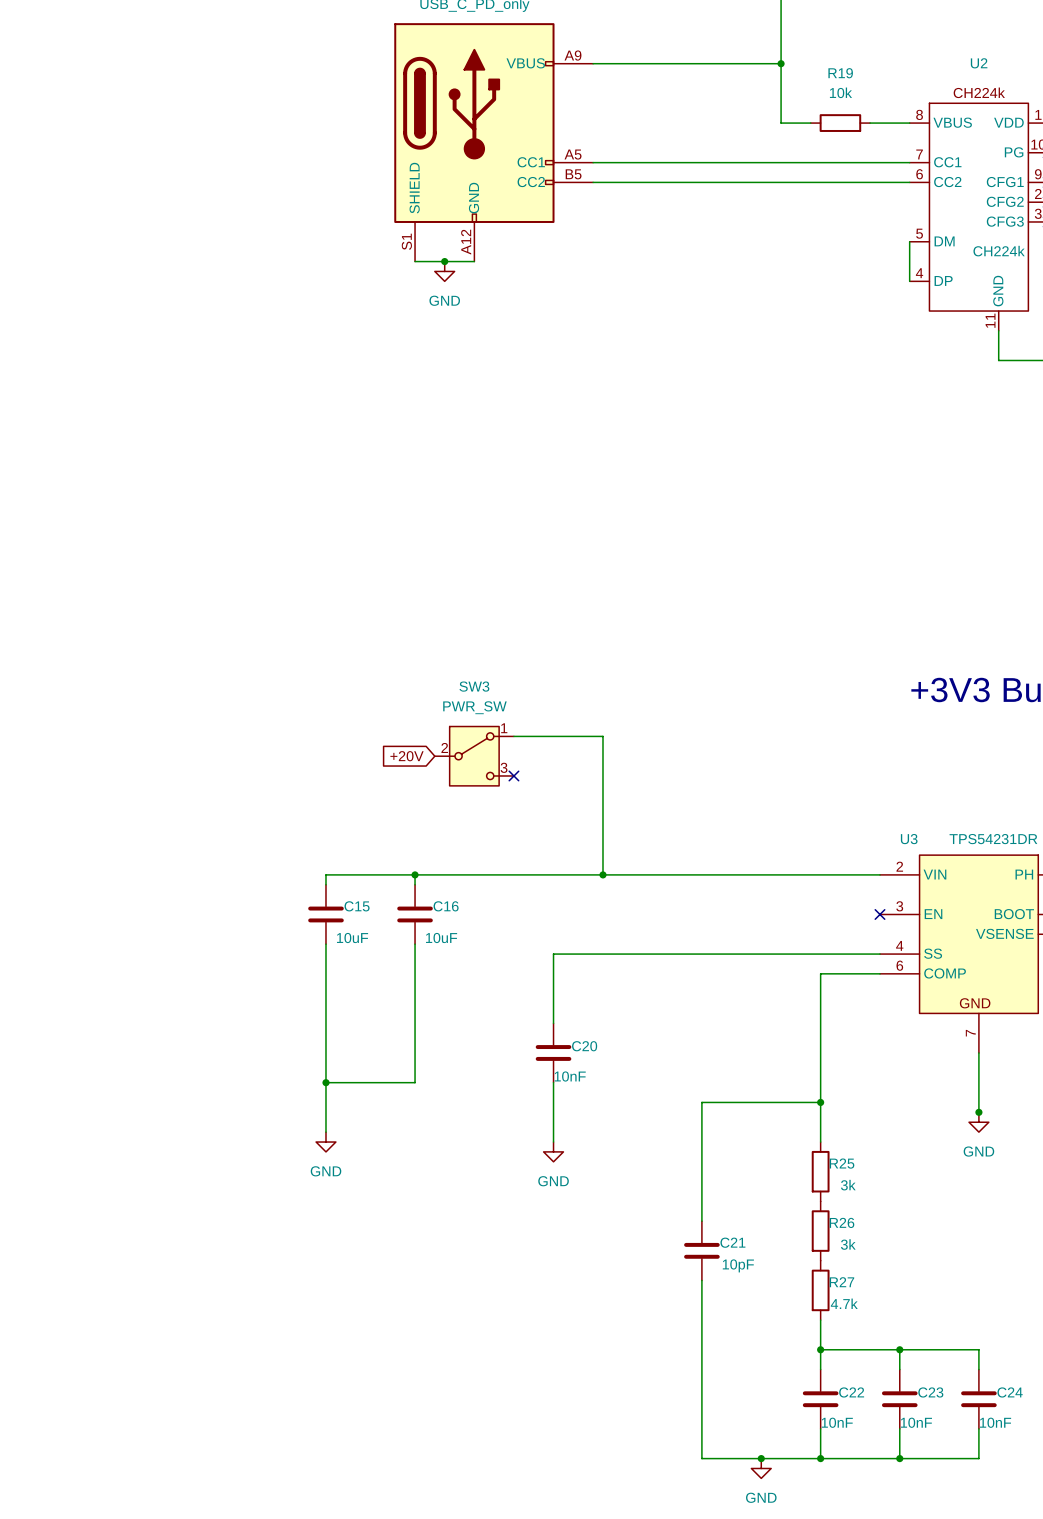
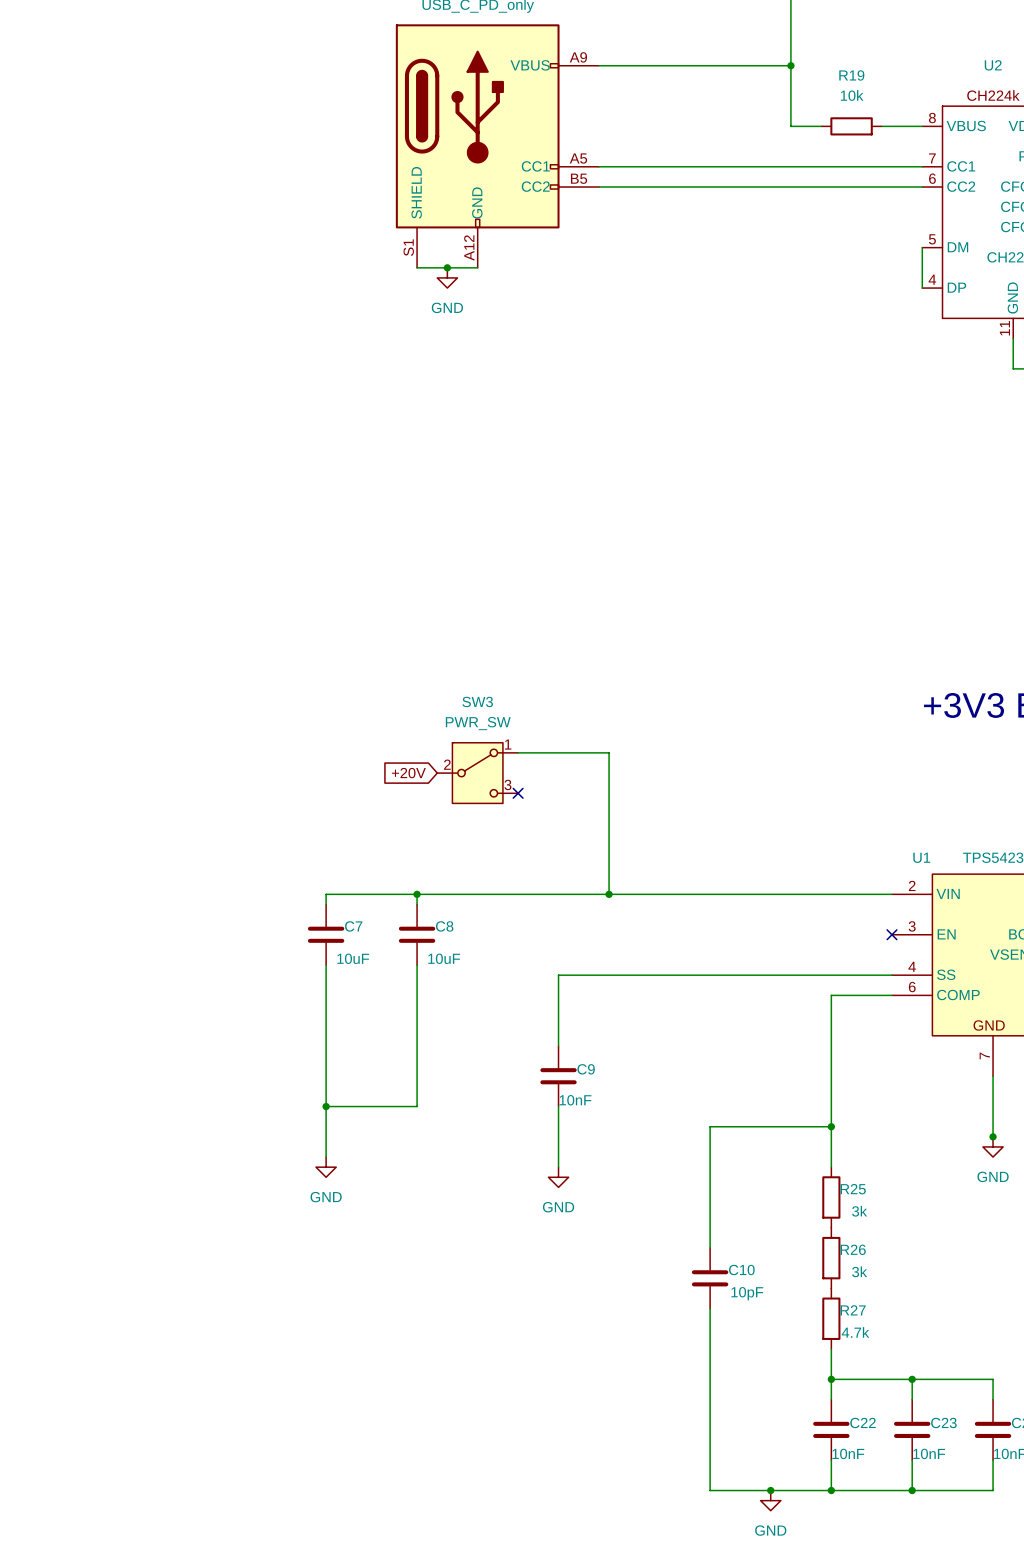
U3 name: U3 (909, 839) -> U1 (921, 857)
C15 name: C15 (357, 906) -> C7 (353, 926)
C16 name: C16 (446, 906) -> C8 (444, 926)
C20 name: C20 (584, 1046) -> C9 (586, 1069)
C21 name: C21 (732, 1242) -> C10 (741, 1270)

